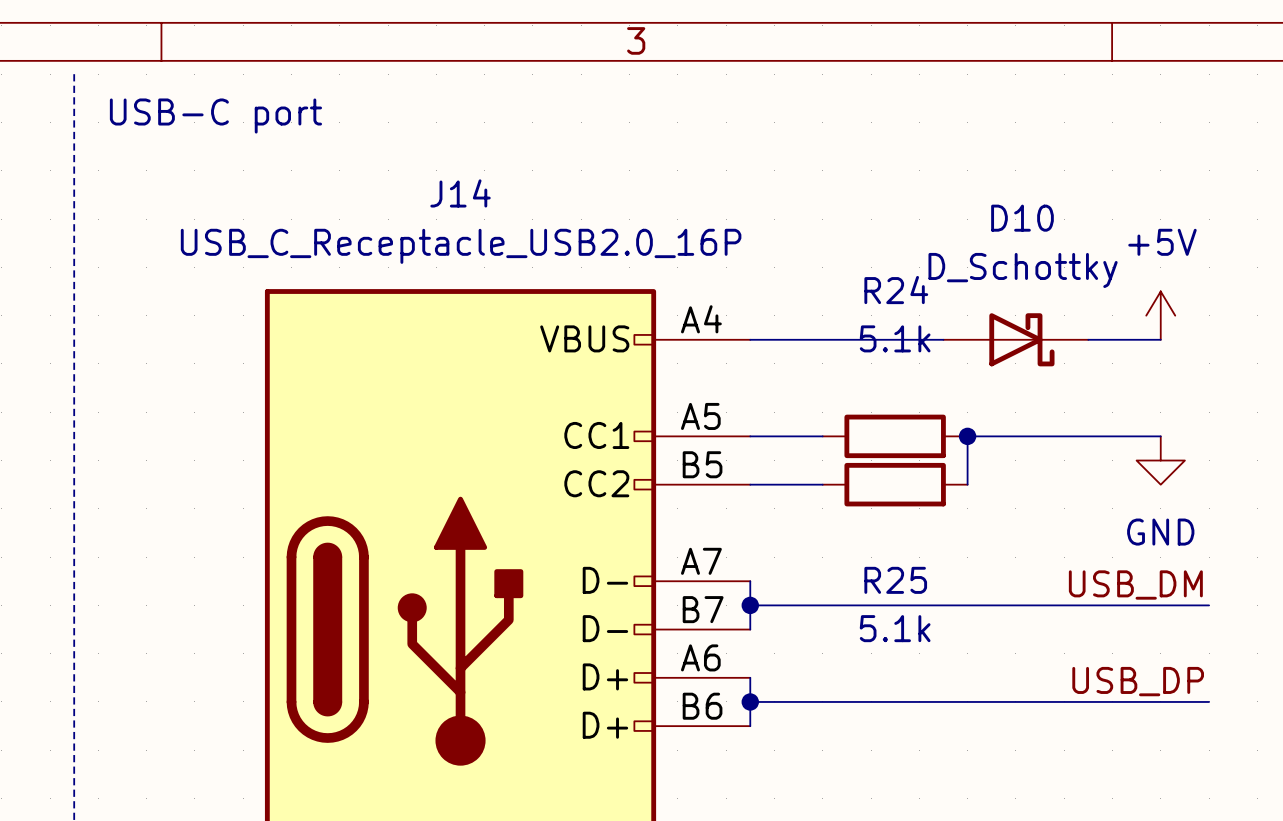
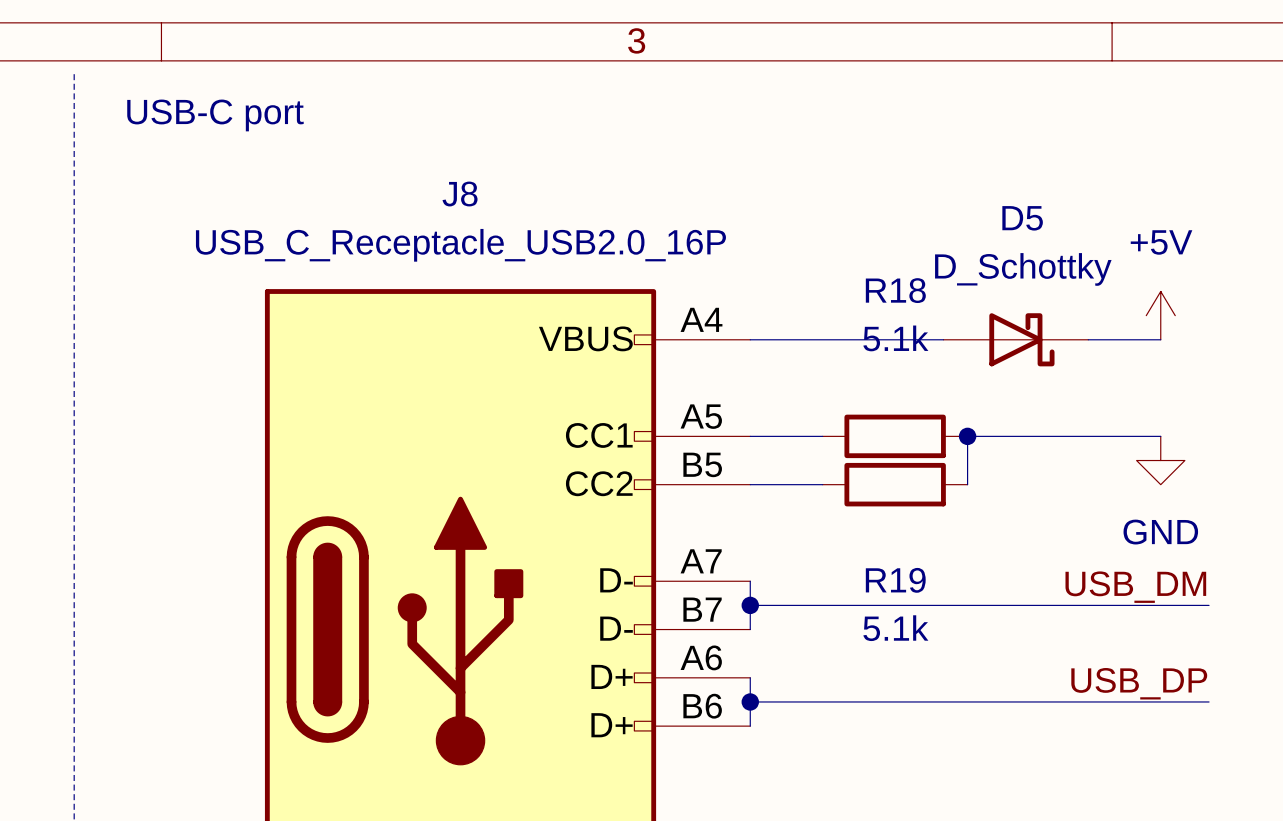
J14 name: J14 (460, 193) -> J8 (460, 194)
D10 name: D10 (1022, 218) -> D5 (1022, 218)
R24 name: R24 (896, 290) -> R18 (895, 290)
R25 name: R25 (895, 580) -> R19 (895, 580)

